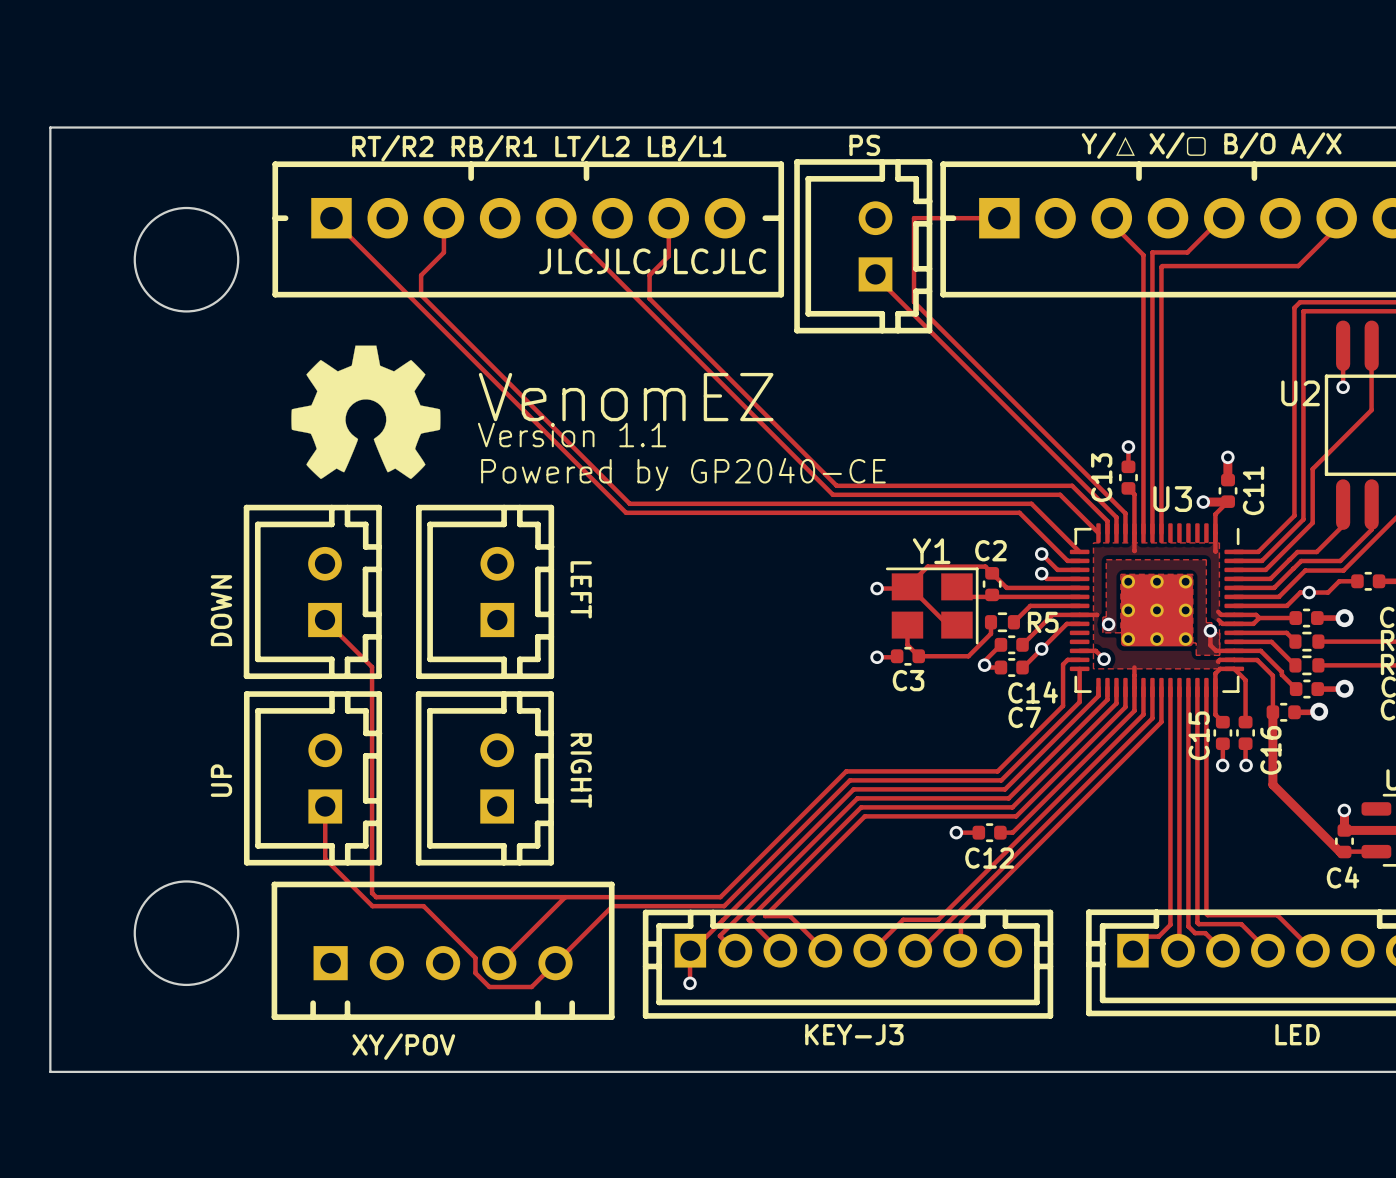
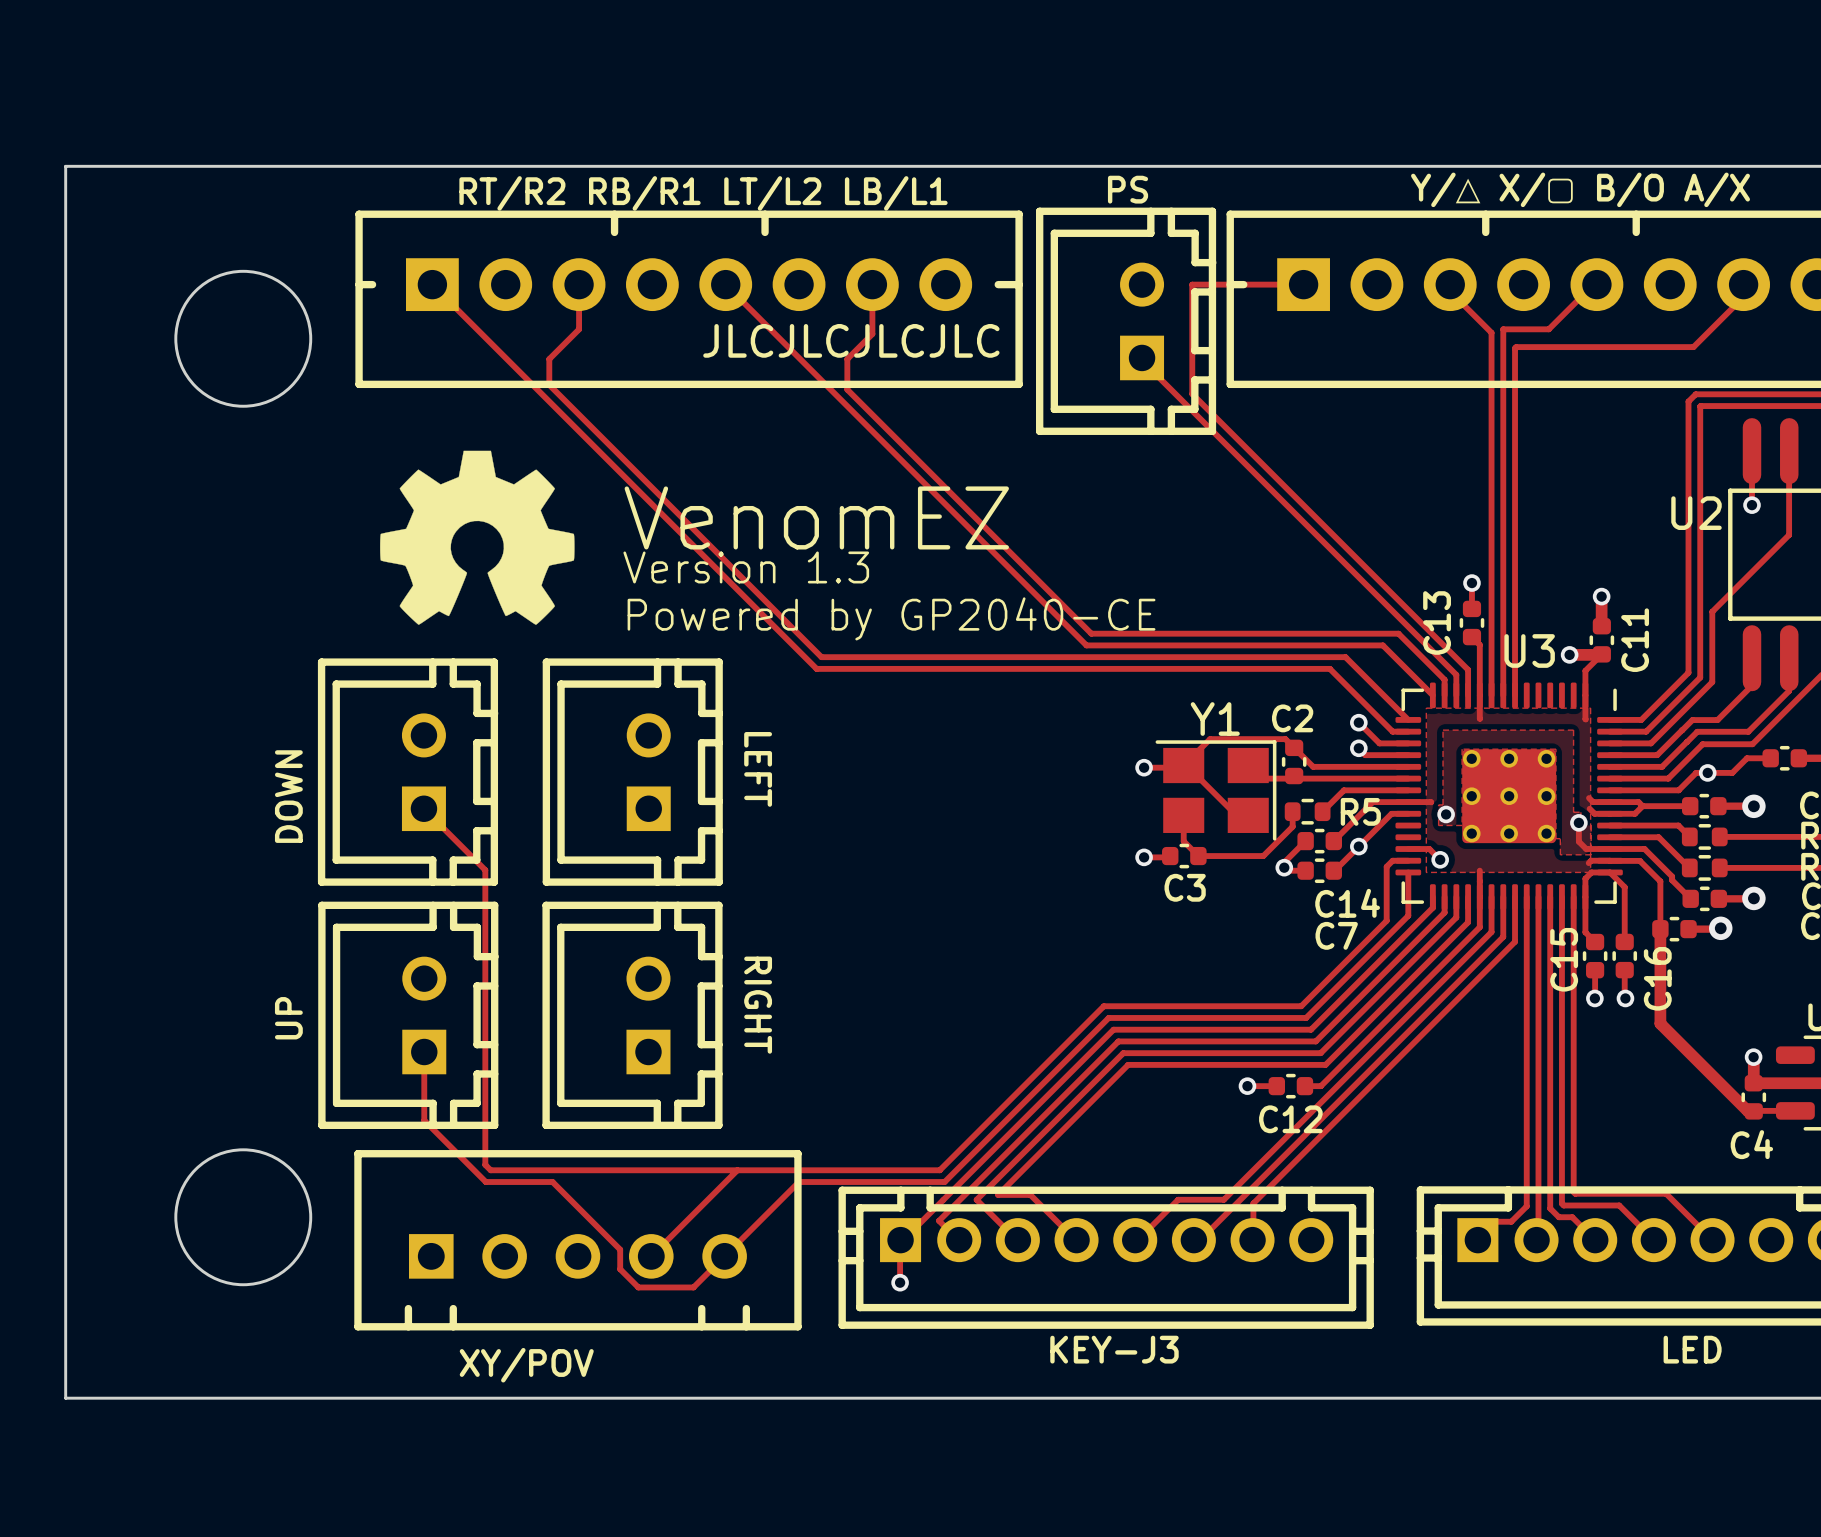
text: Version 1.1 (572, 435) -> Version 1.3 (746, 567)

